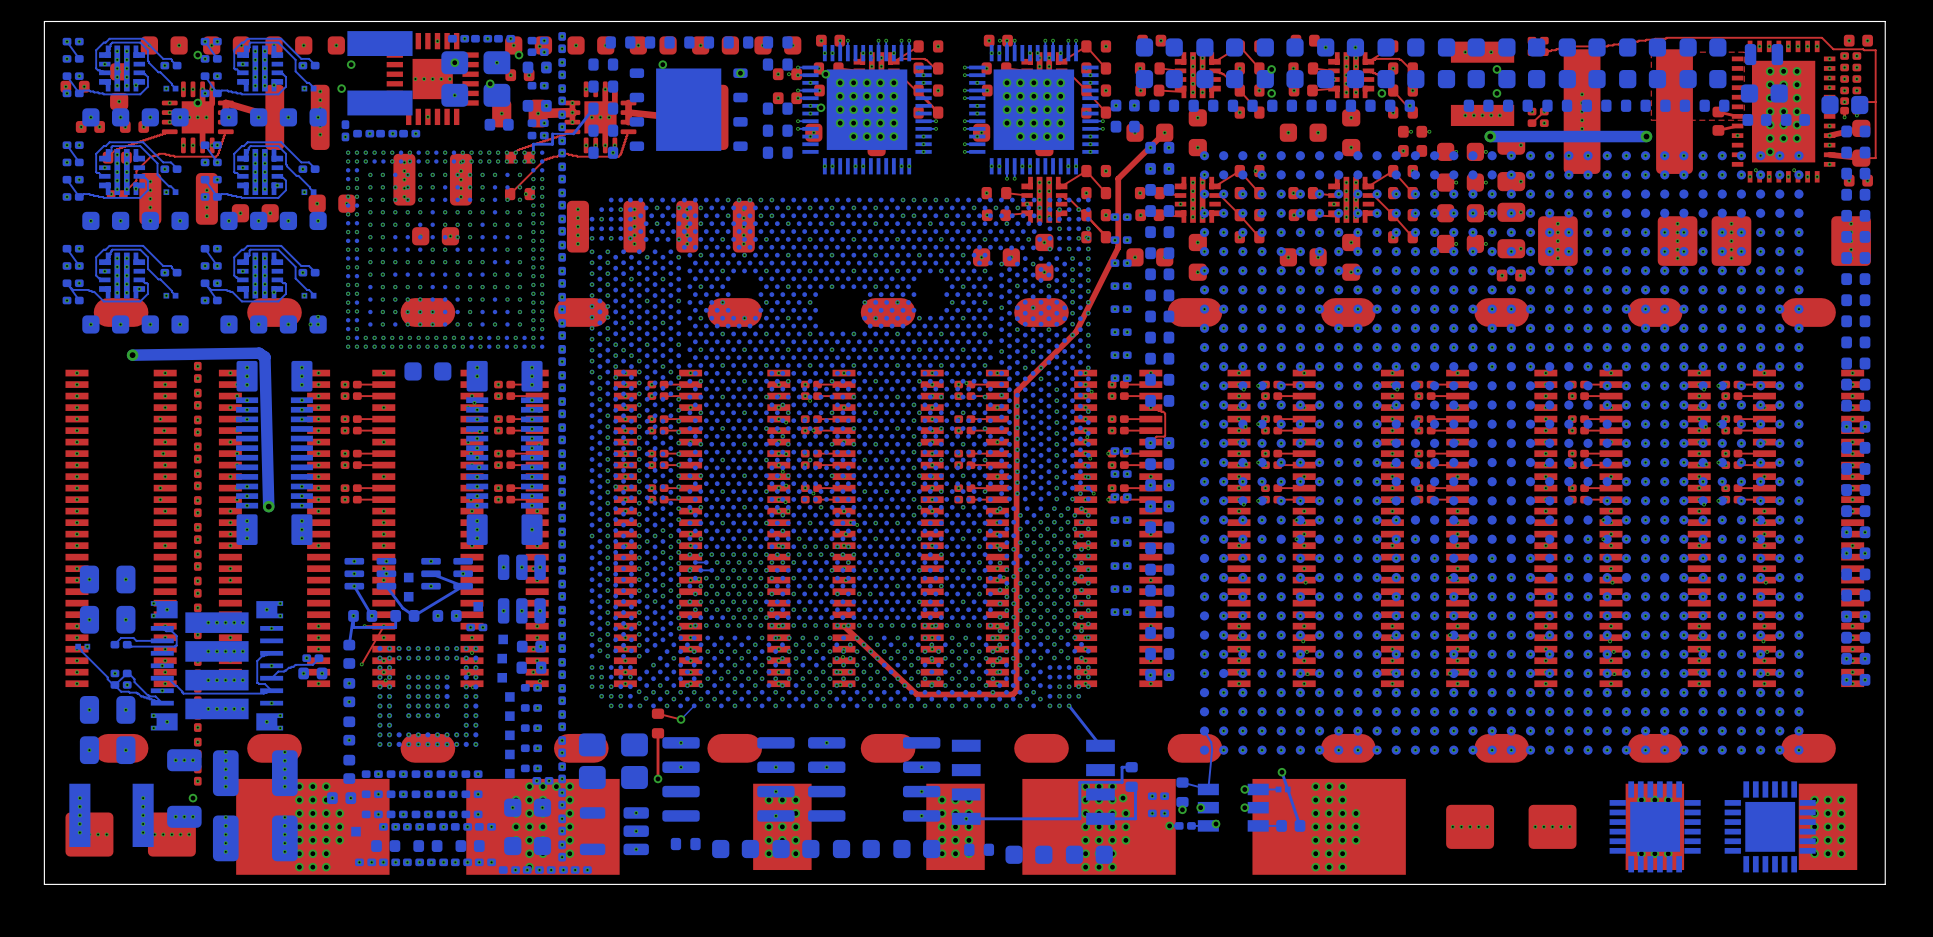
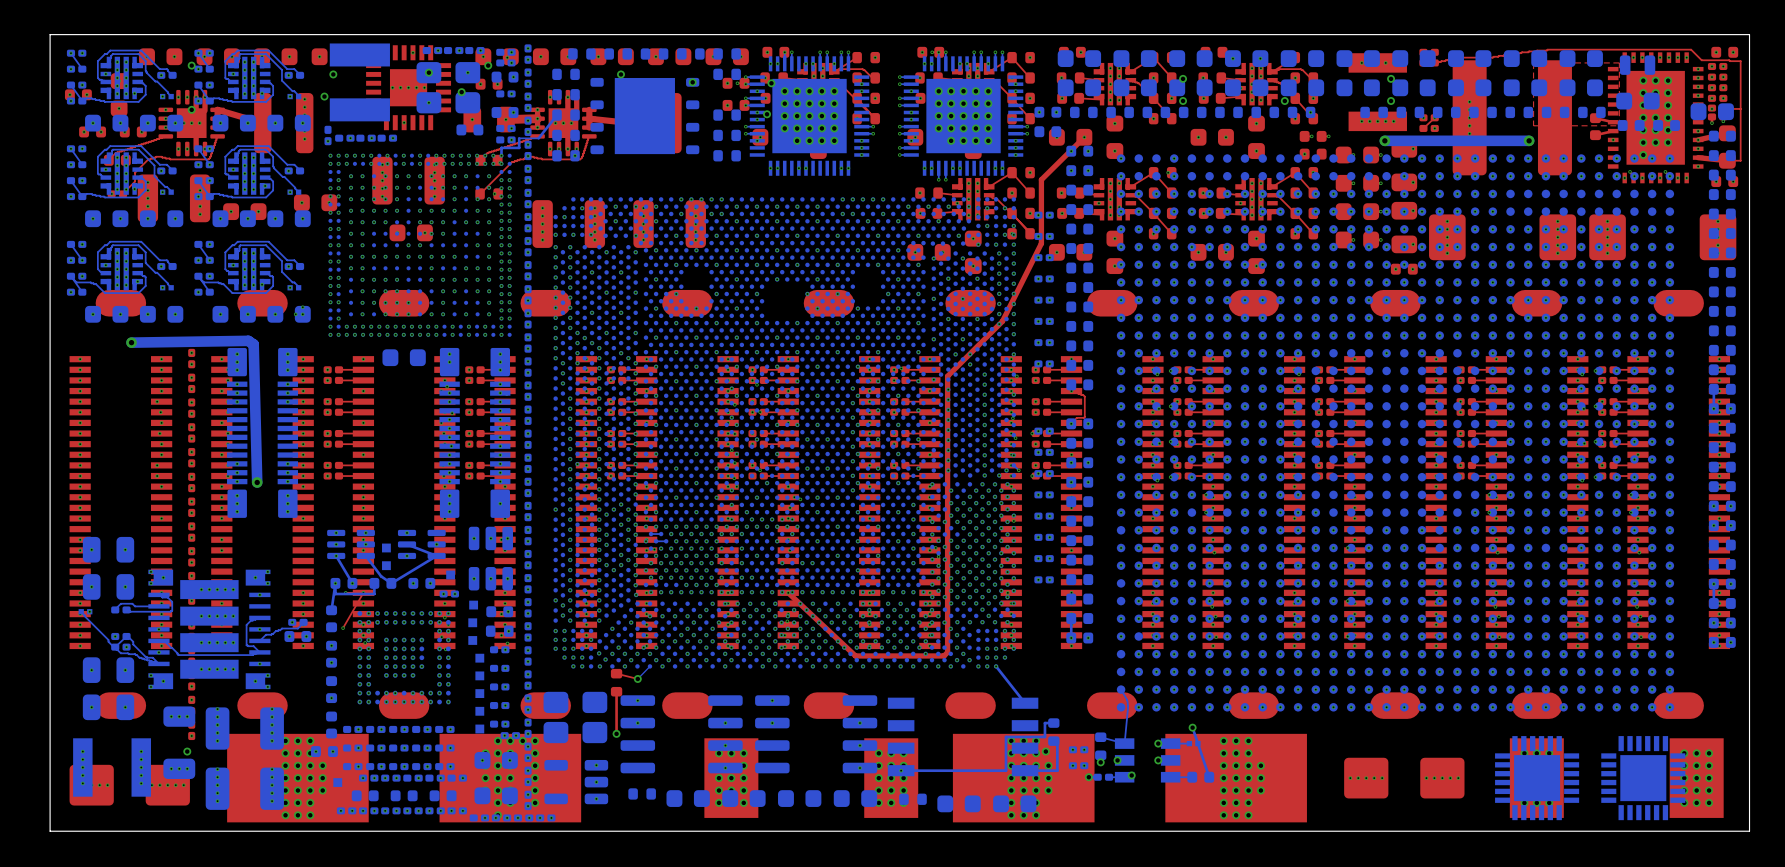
bottom track: none -> (1713, 389) (1713, 408)
bottom track: none -> (1713, 584) (1713, 603)
bottom track: none -> (1071, 618) (1071, 638)

